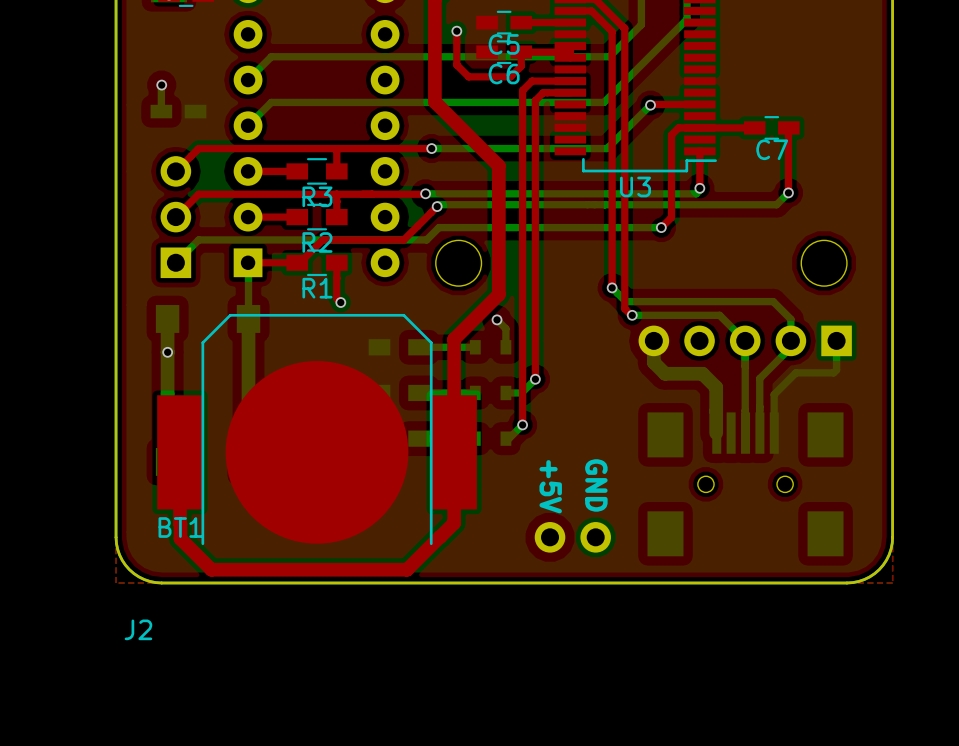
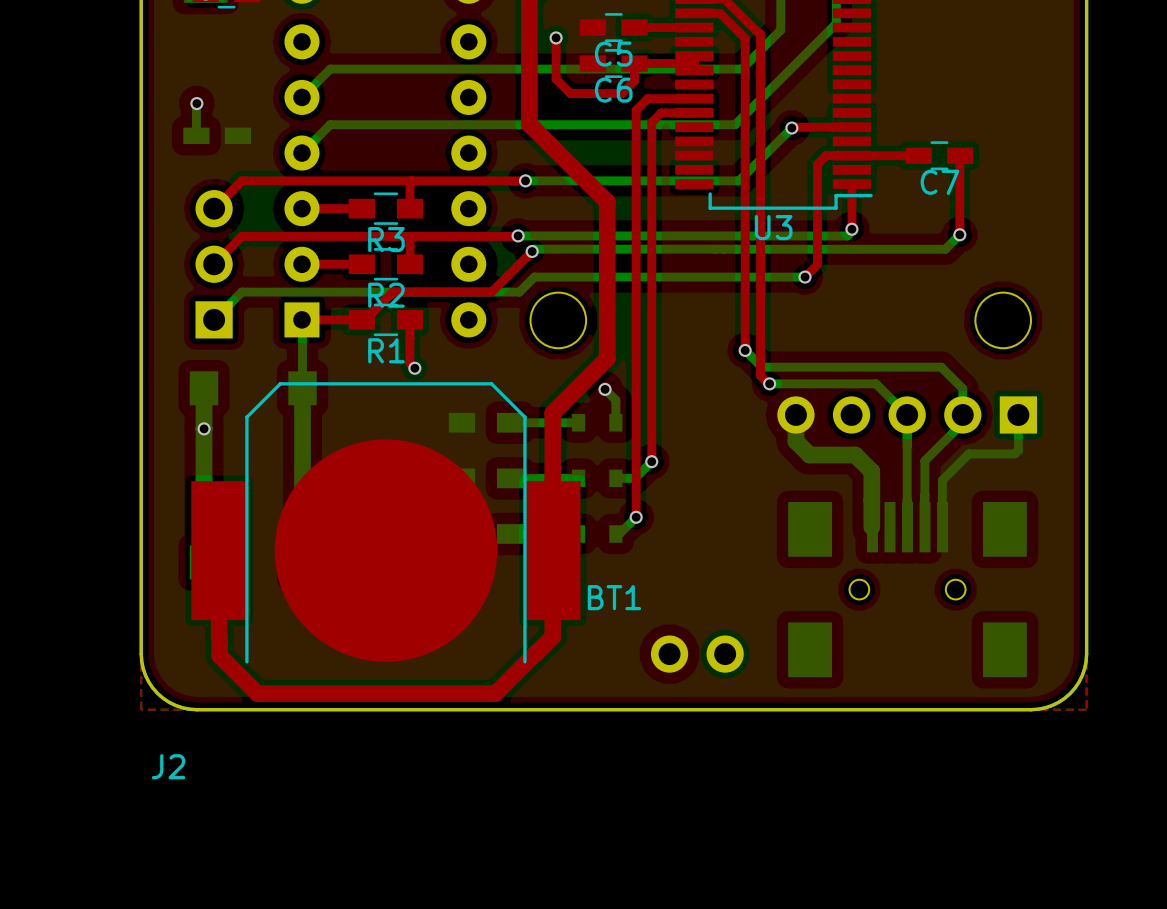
text: GND (596, 485) -> none
text: +5V (550, 486) -> none
BT1 name position: BT1 (180, 527) -> BT1 (614, 597)

